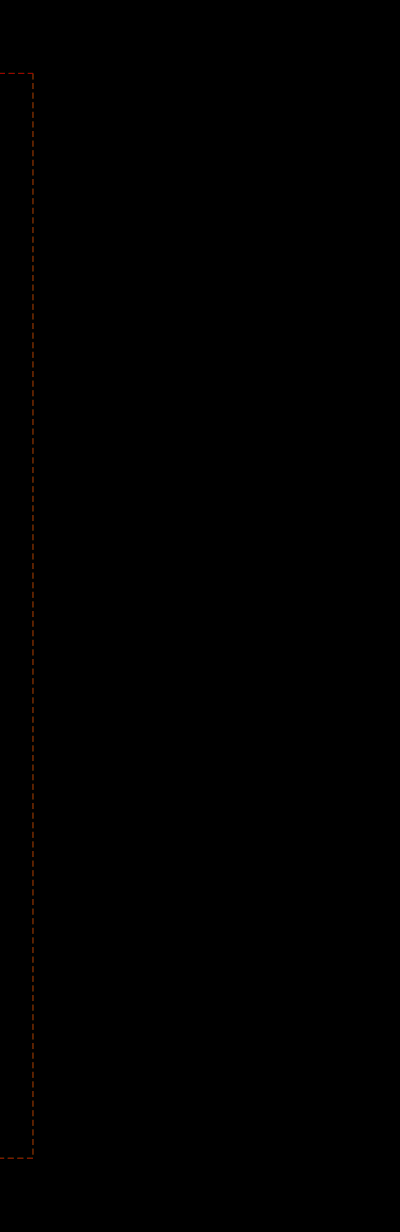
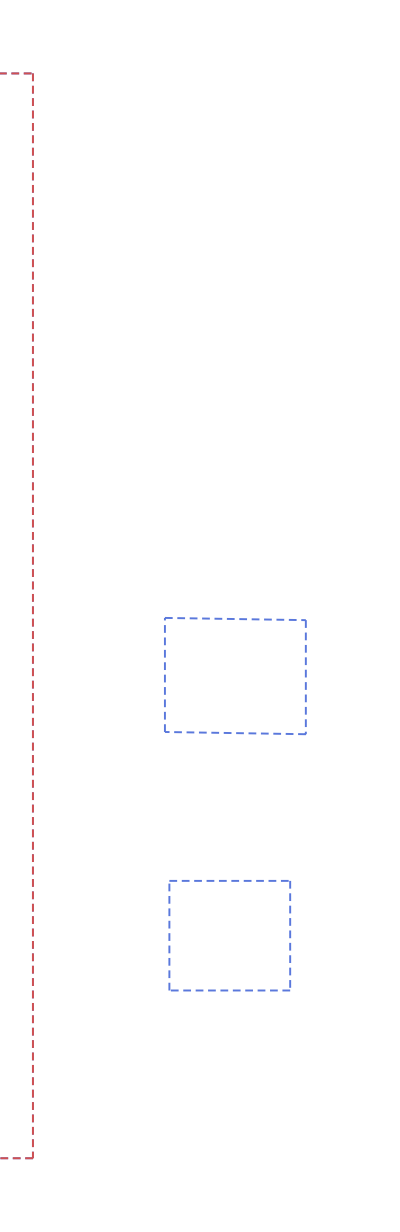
bottom zone outline: none -> (164, 617) (305, 620) (305, 734) (164, 731) (164, 617)
bottom zone outline: none -> (169, 880) (290, 880) (290, 990) (169, 990) (169, 880)

